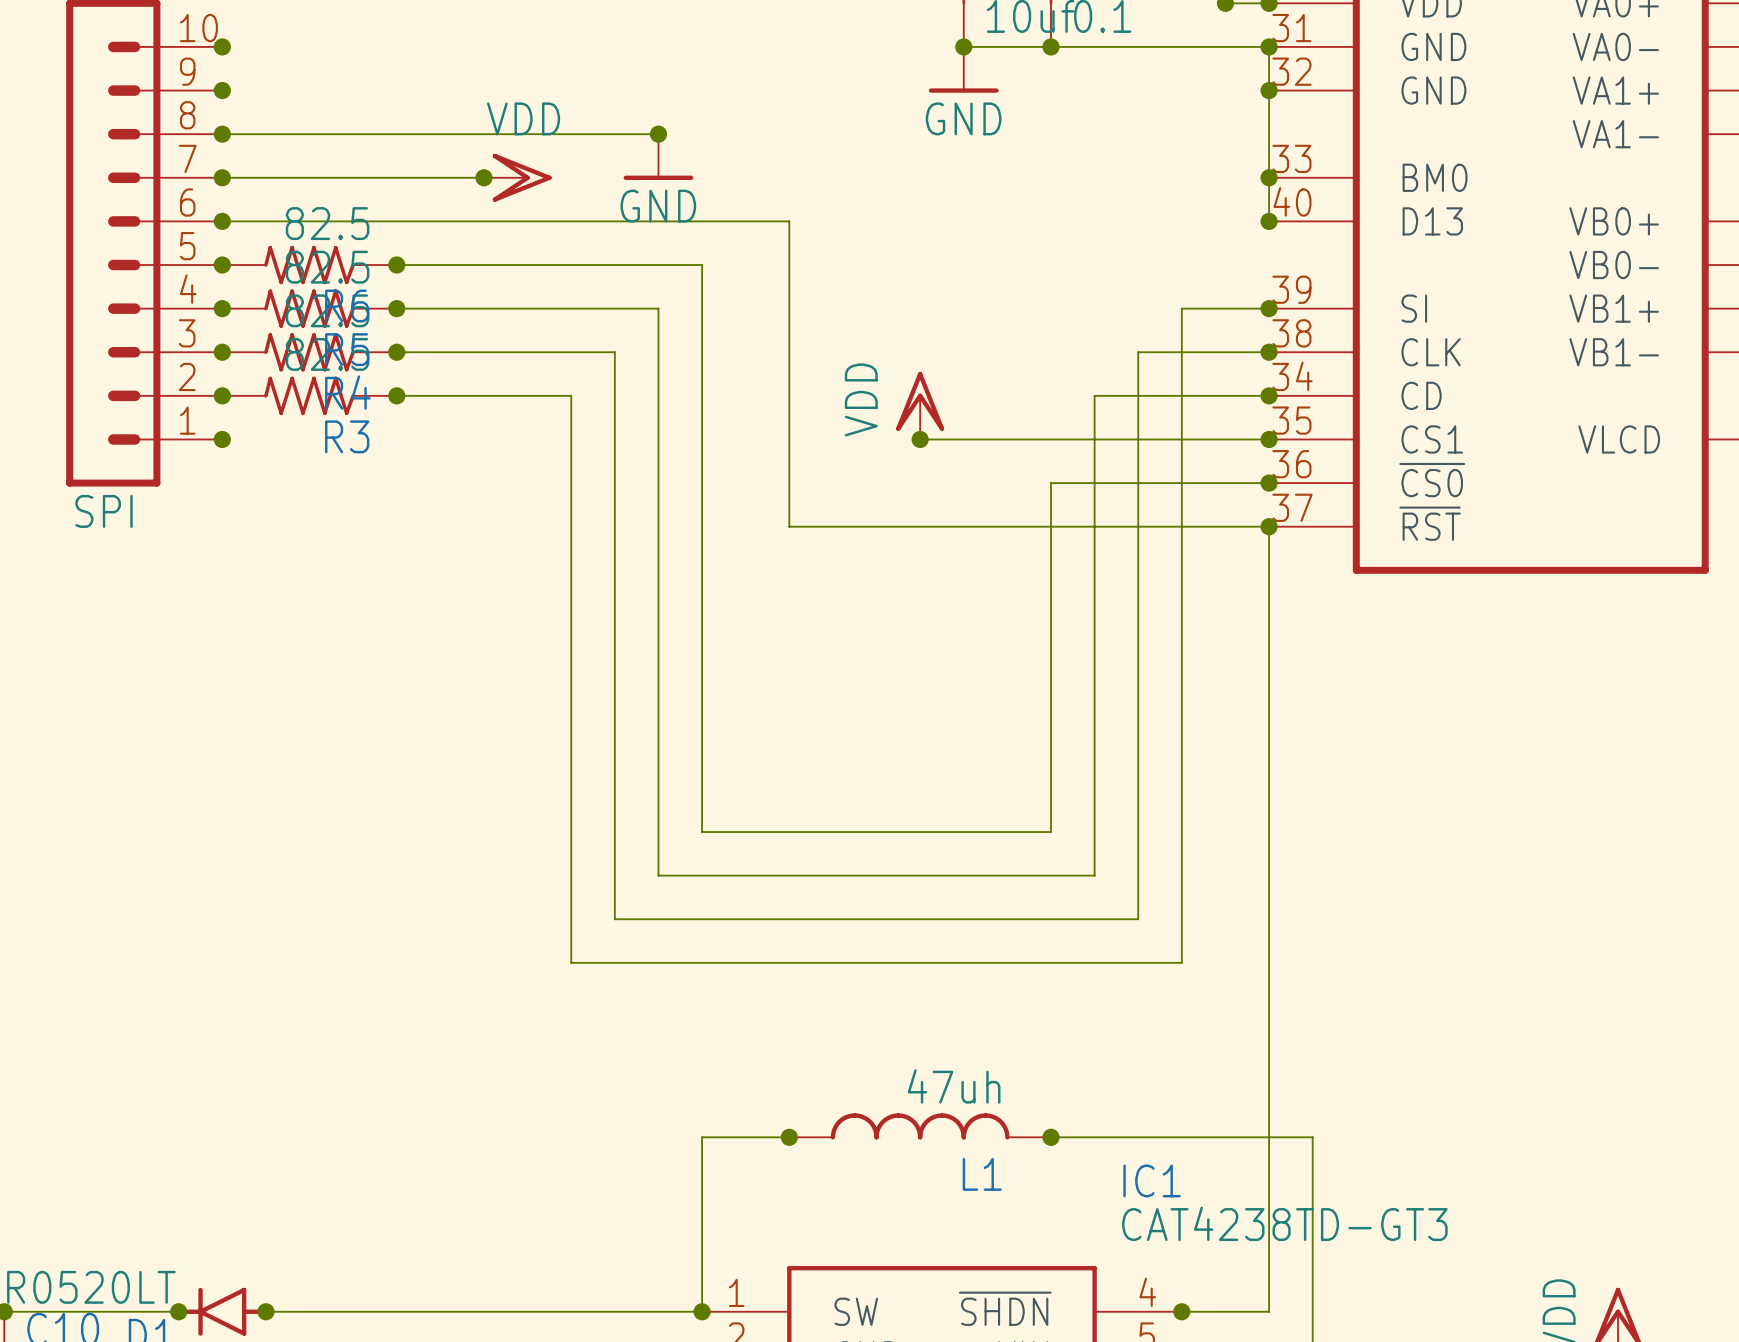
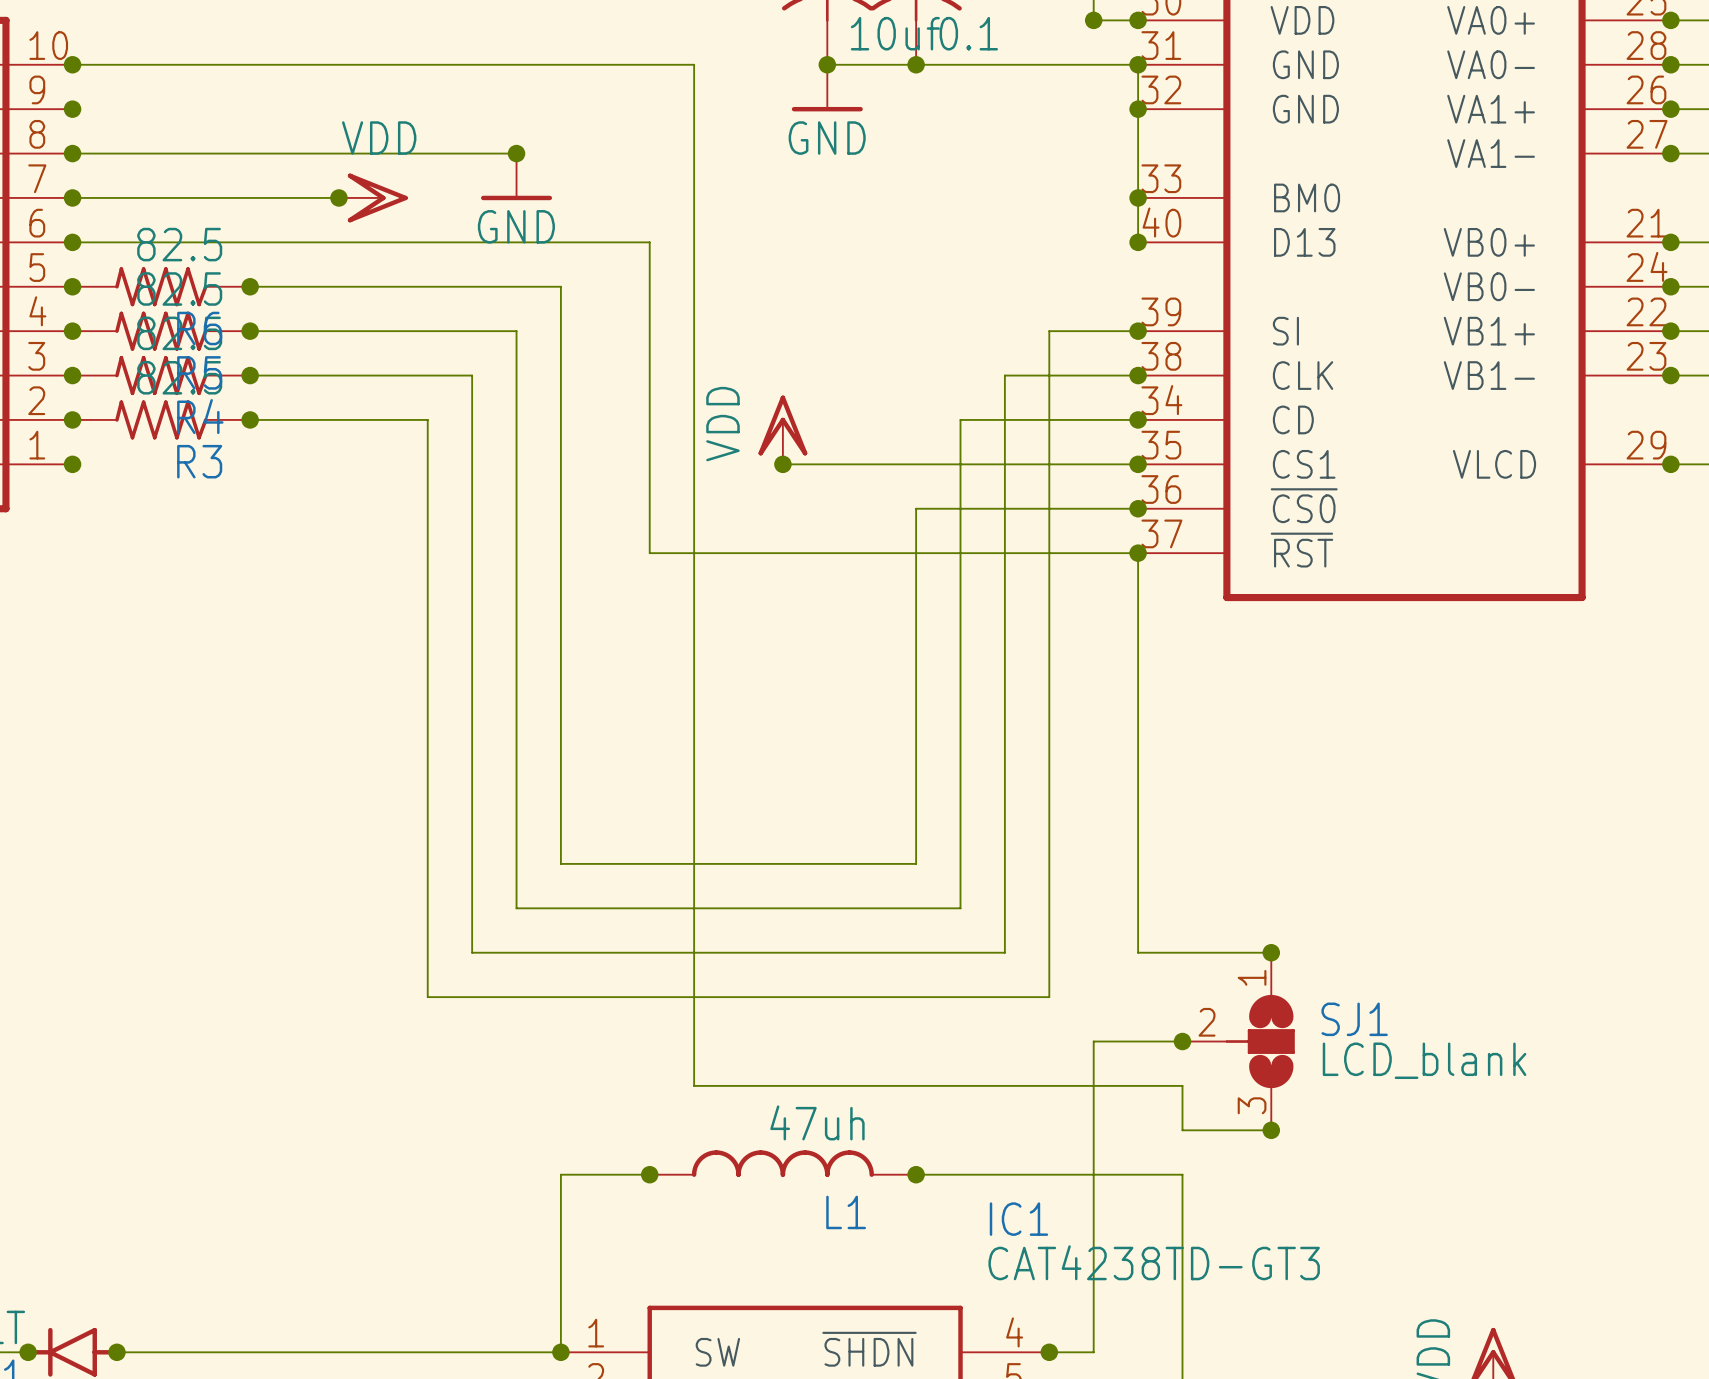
wire: none -> (72, 64) (694, 64) (694, 1085) (1182, 1085) (1182, 1130) (1271, 1130)
wire: (1269, 919) (1269, 1311) (1225, 1311) -> (1182, 1041) (1093, 1041) (1093, 1352)
wire: none -> (1138, 952) (1271, 952)
junction: none -> (1271, 952)
junction: none -> (1182, 1041)
SJ1: none -> LCD_blank (1238, 1041)
junction: none -> (1271, 1130)

